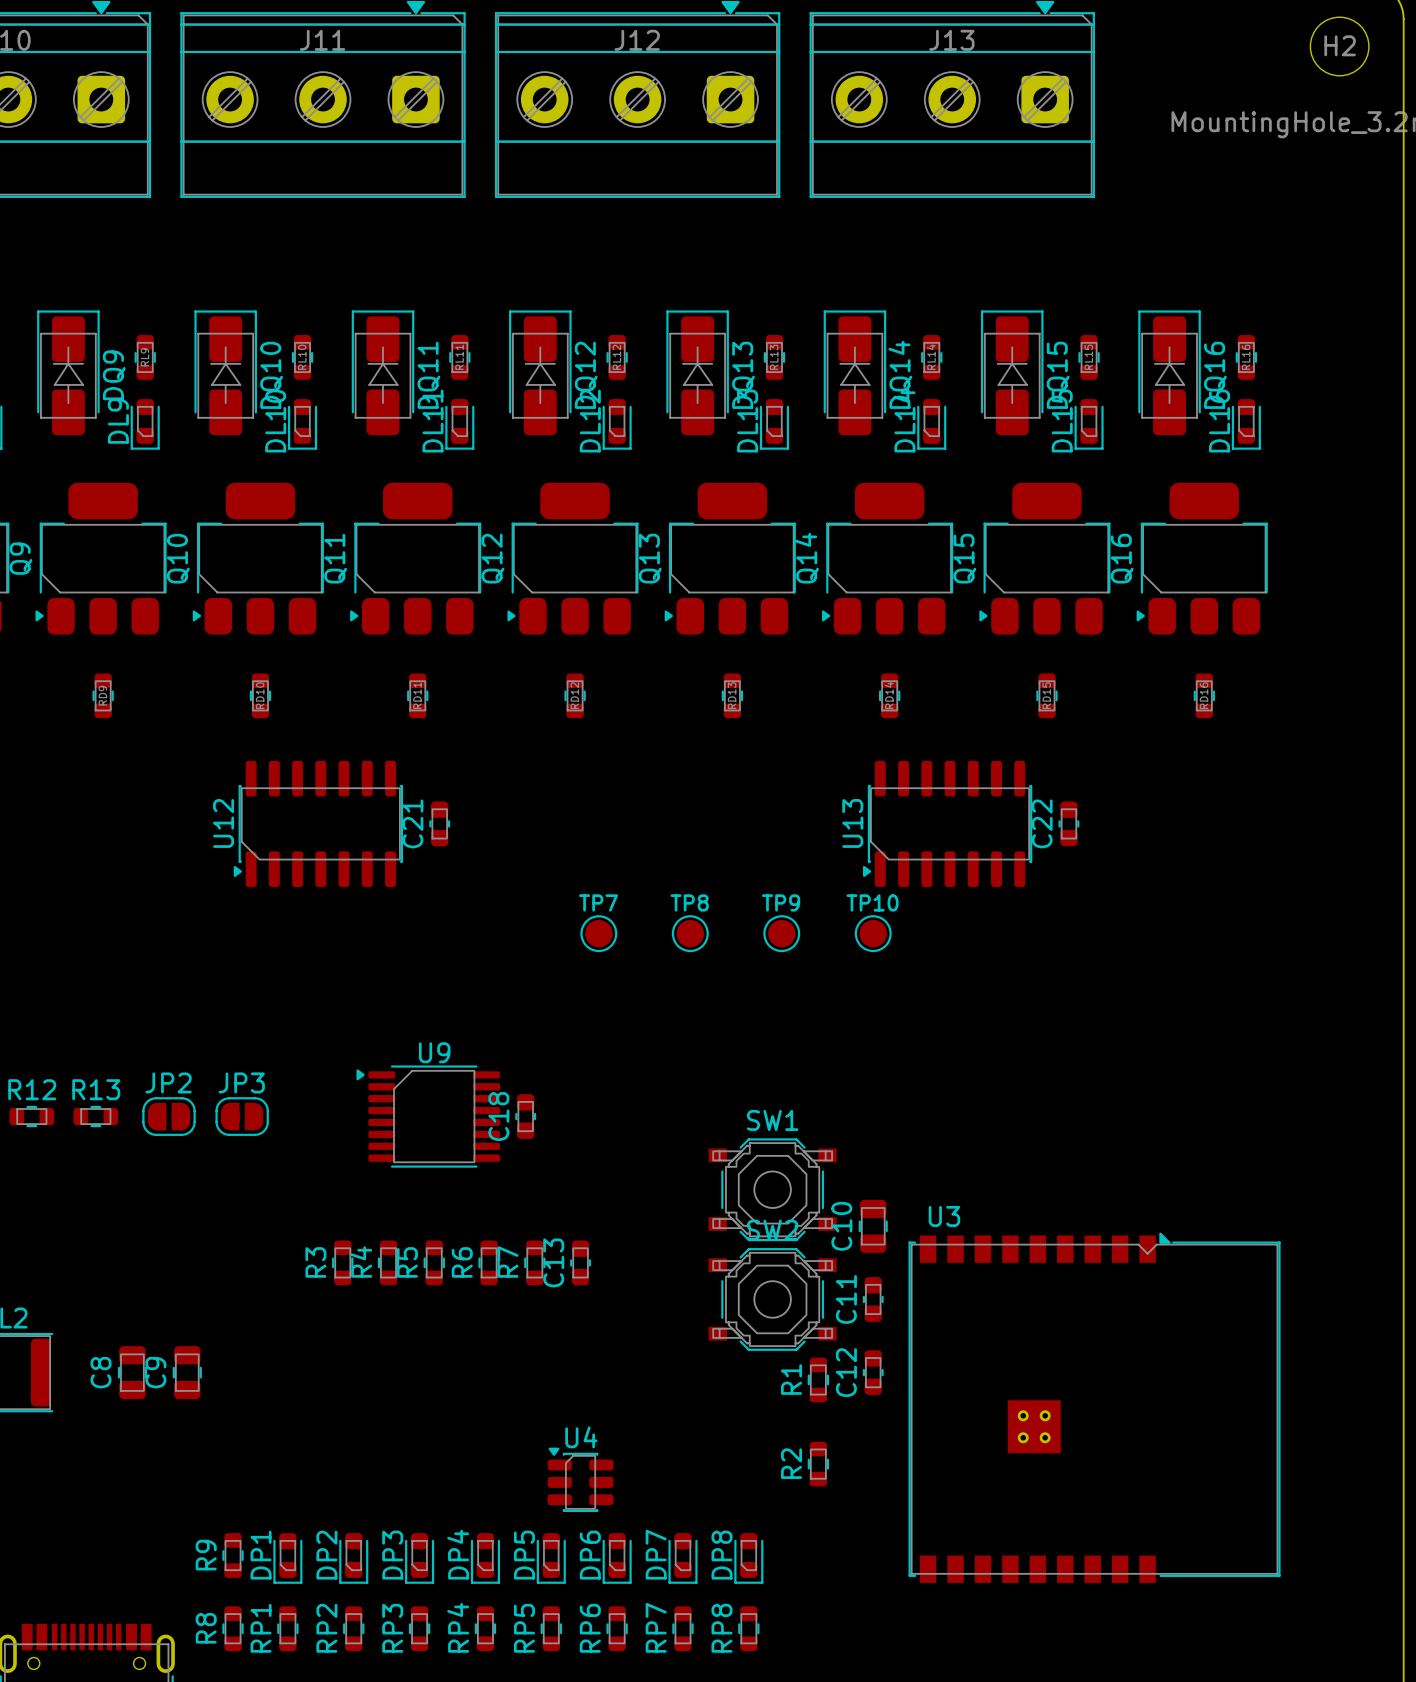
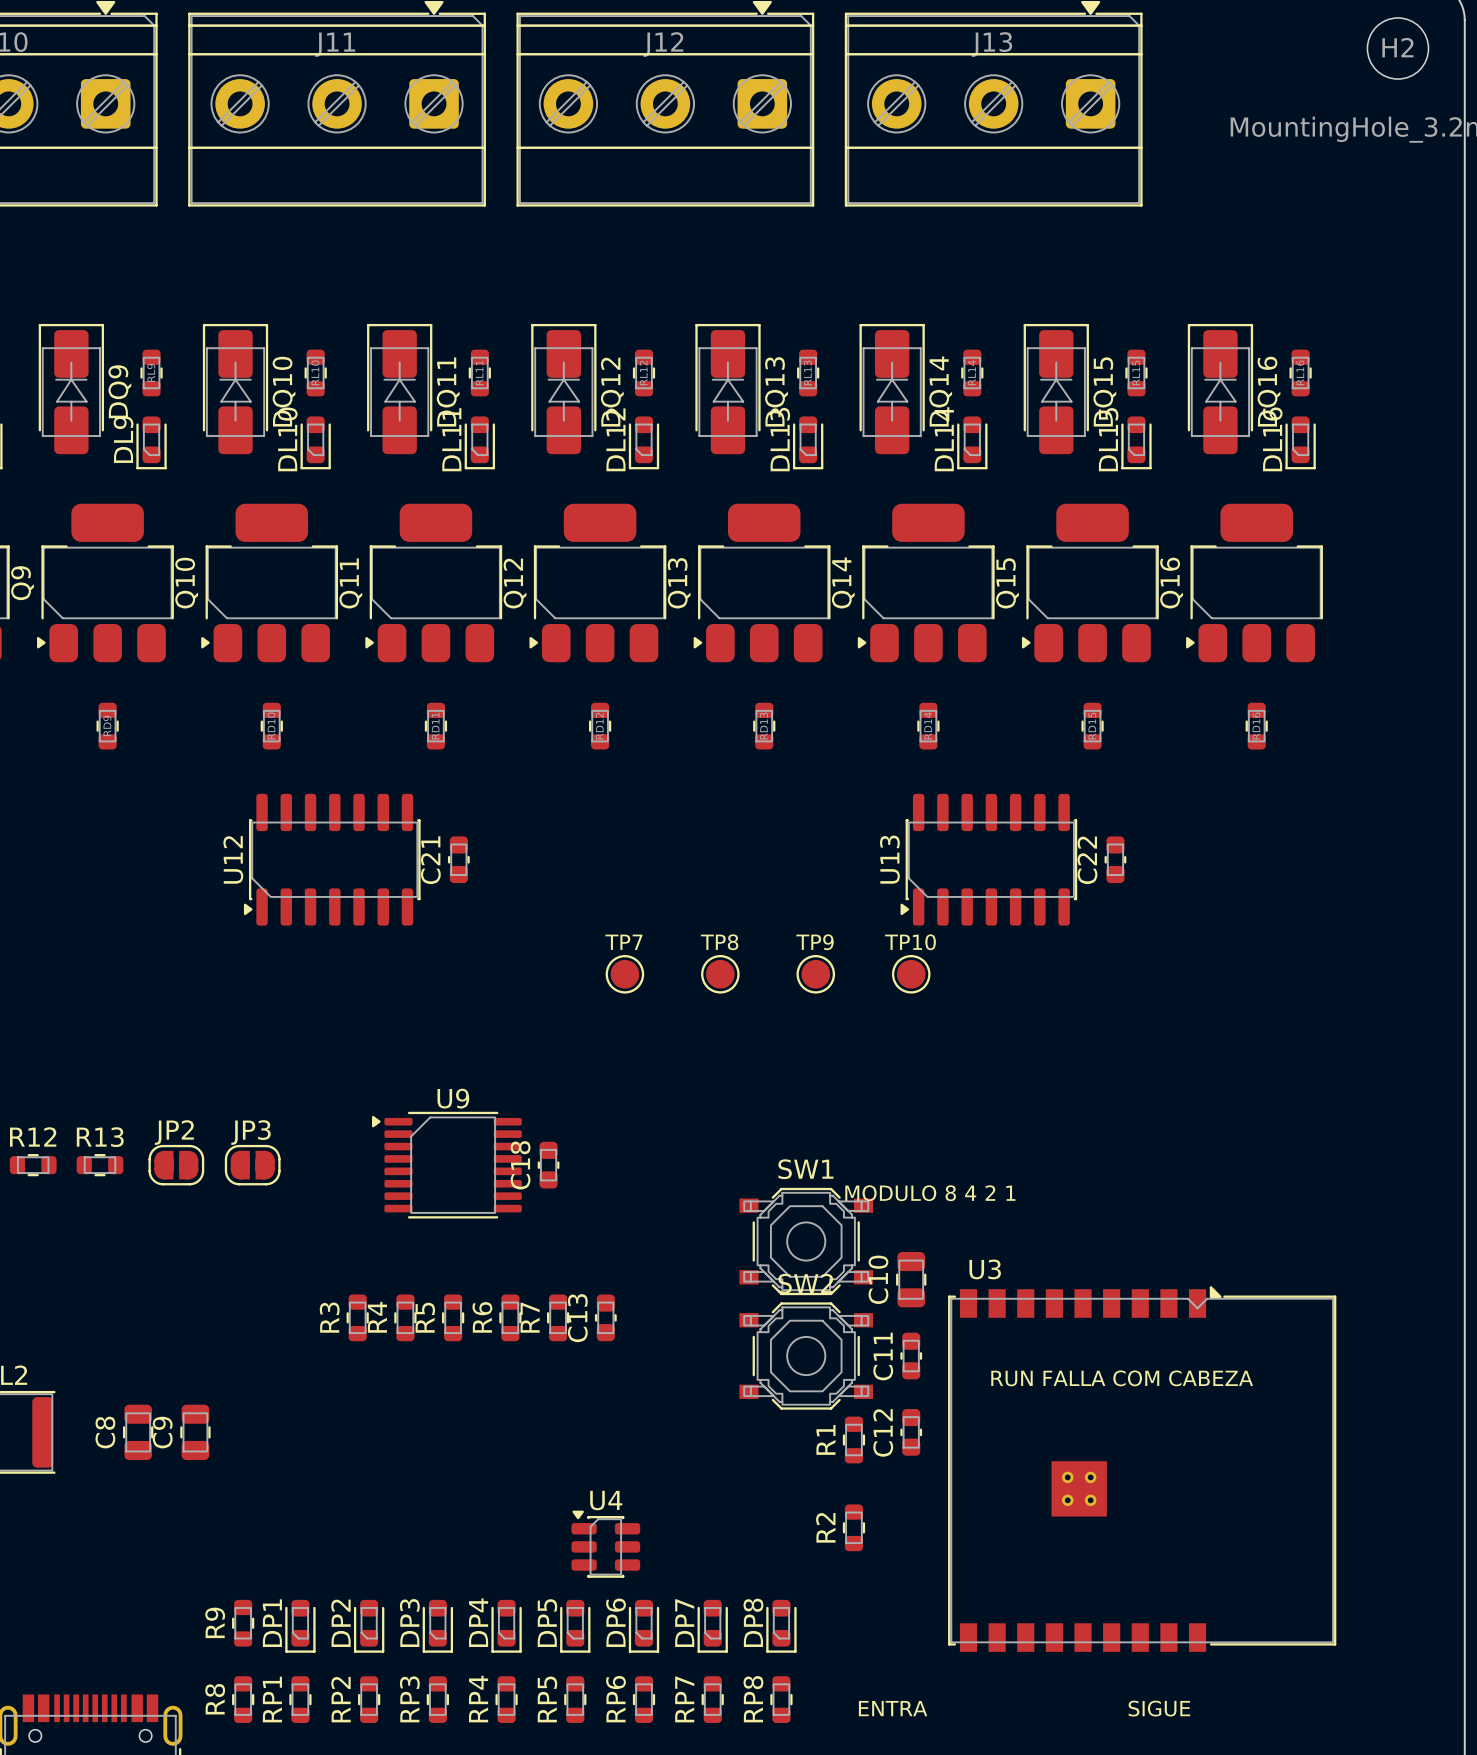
text: none -> MODULO 8 4 2 1 (930, 1193)
text: none -> RUN FALLA COM CABEZA (1122, 1378)
text: none -> ENTRA (893, 1708)
text: none -> SIGUE (1159, 1708)

